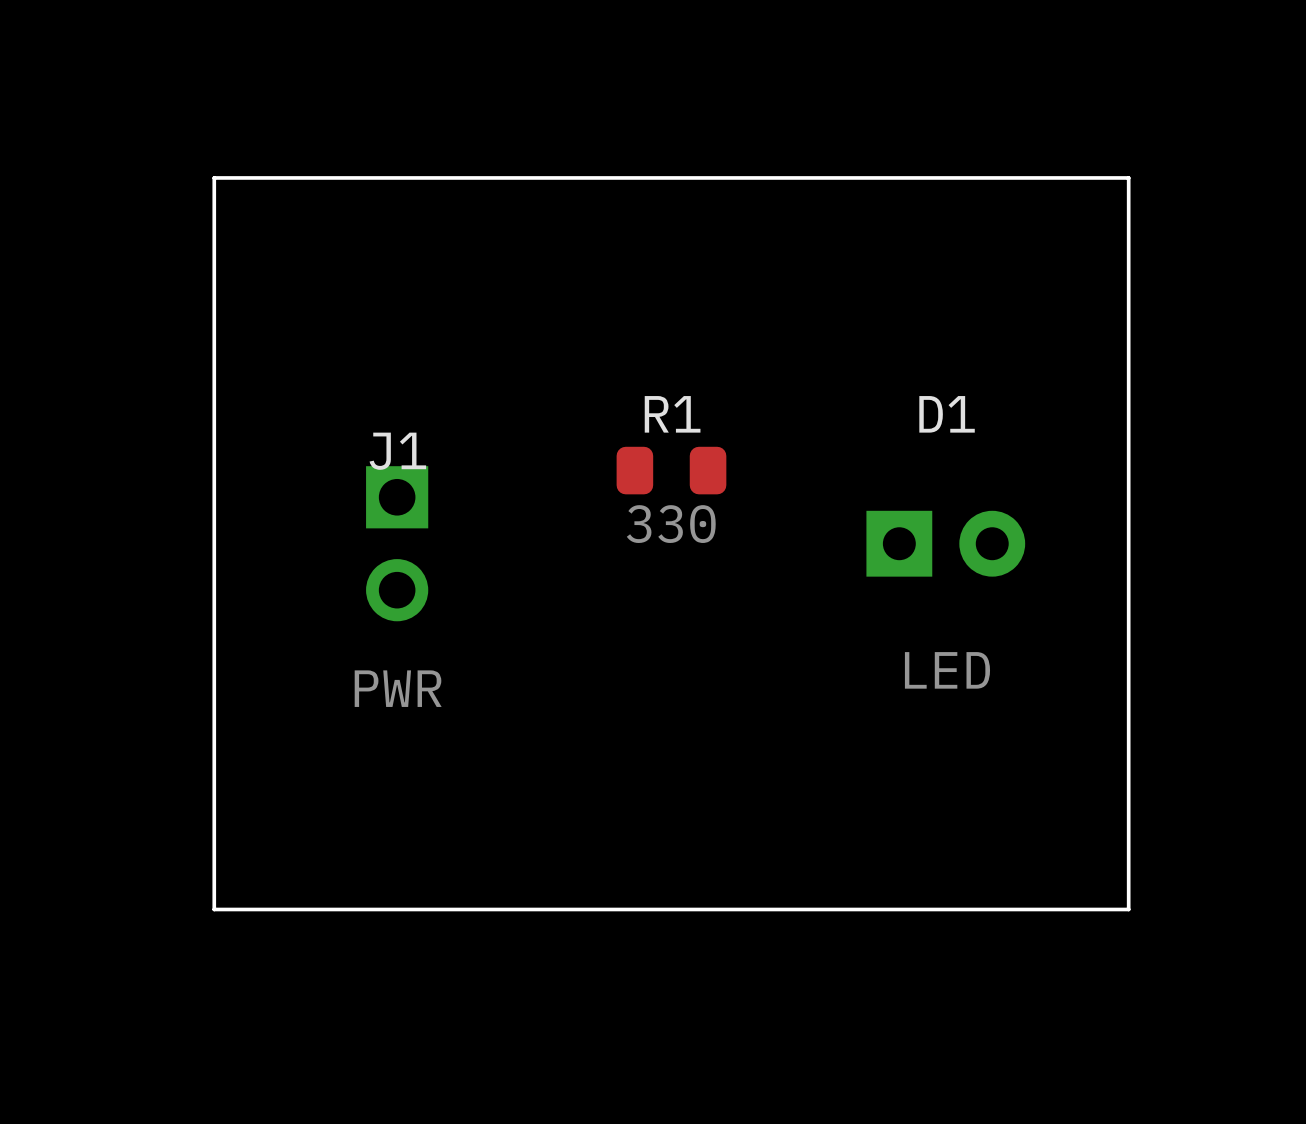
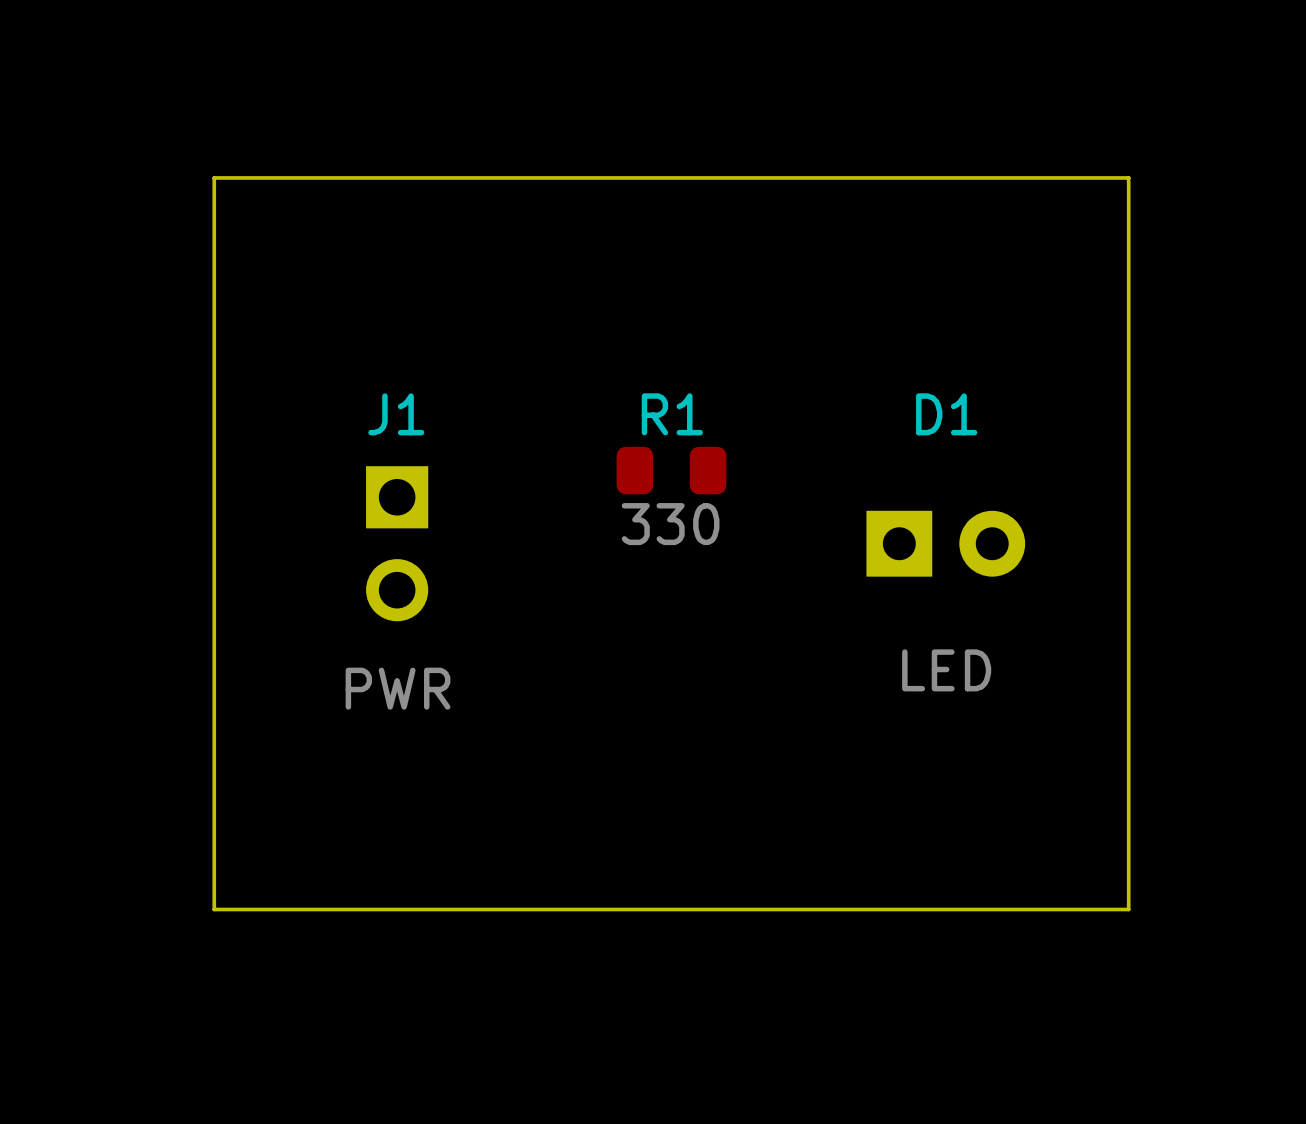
J1 name position: J1 (397, 451) -> J1 (396, 414)

